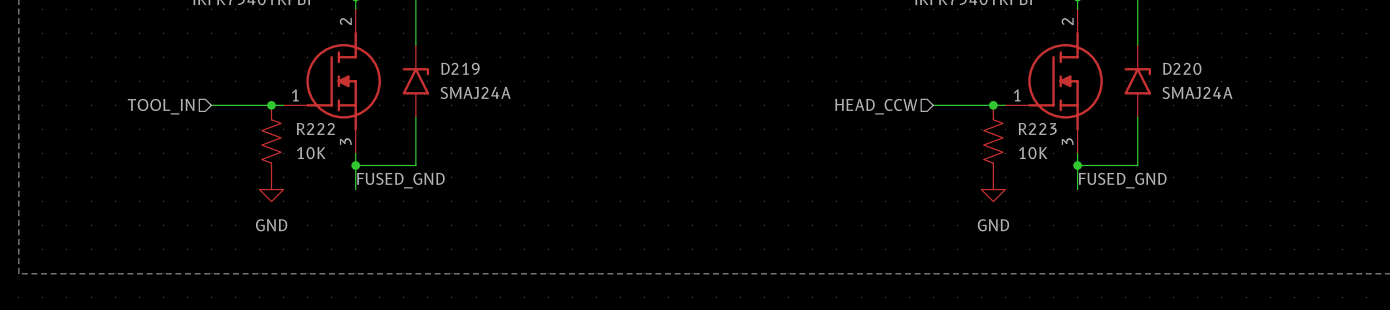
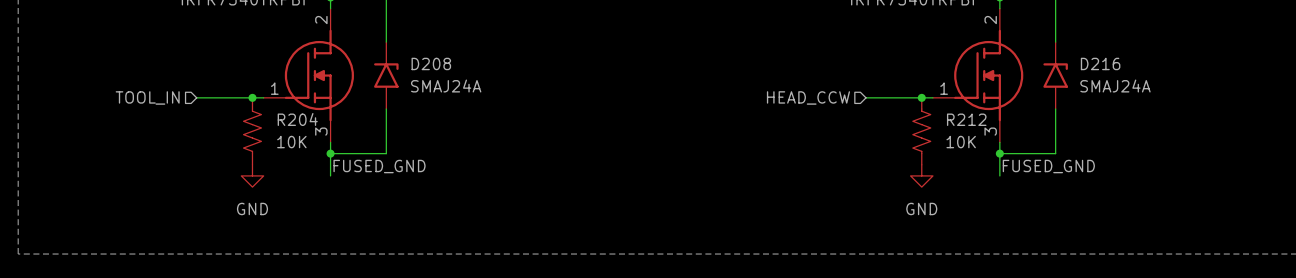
D219 name: D219 (460, 68) -> D208 (431, 63)
D220 name: D220 (1182, 68) -> D216 (1100, 63)
R222 name: R222 (315, 128) -> R204 (297, 119)
R223 name: R223 (1037, 128) -> R212 (966, 119)

